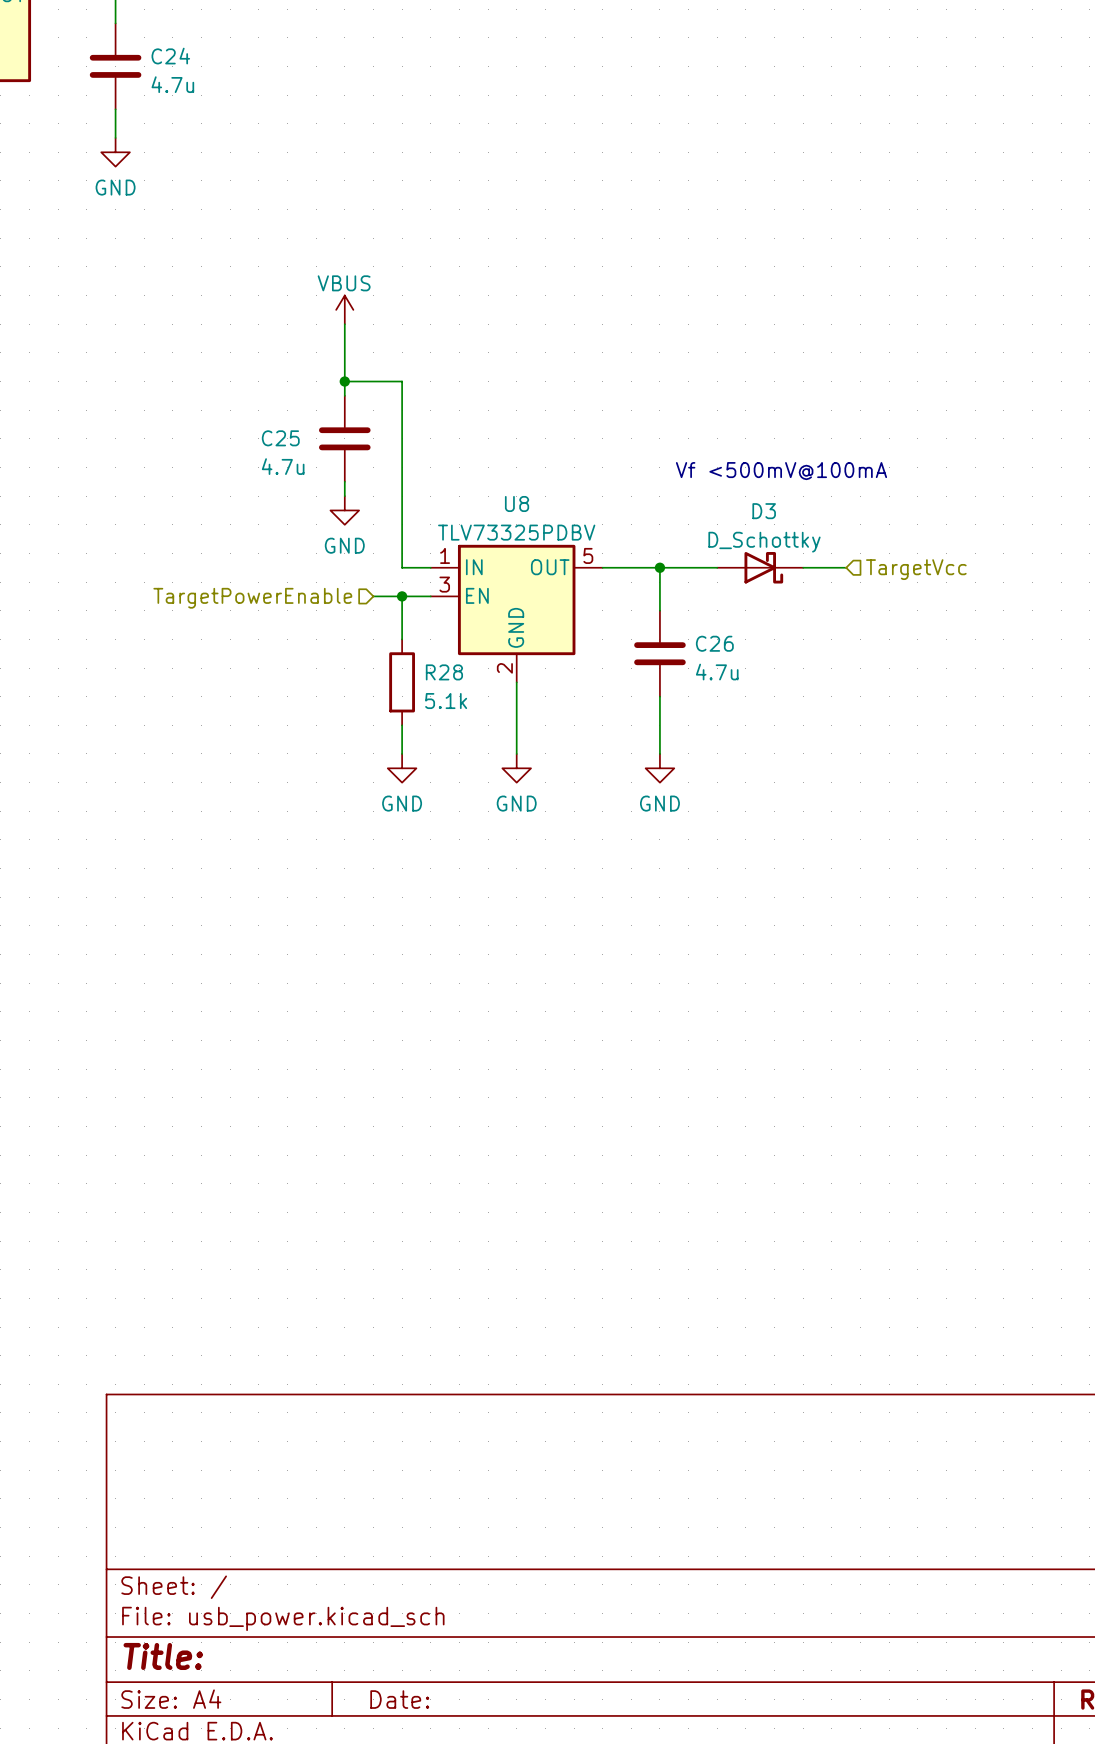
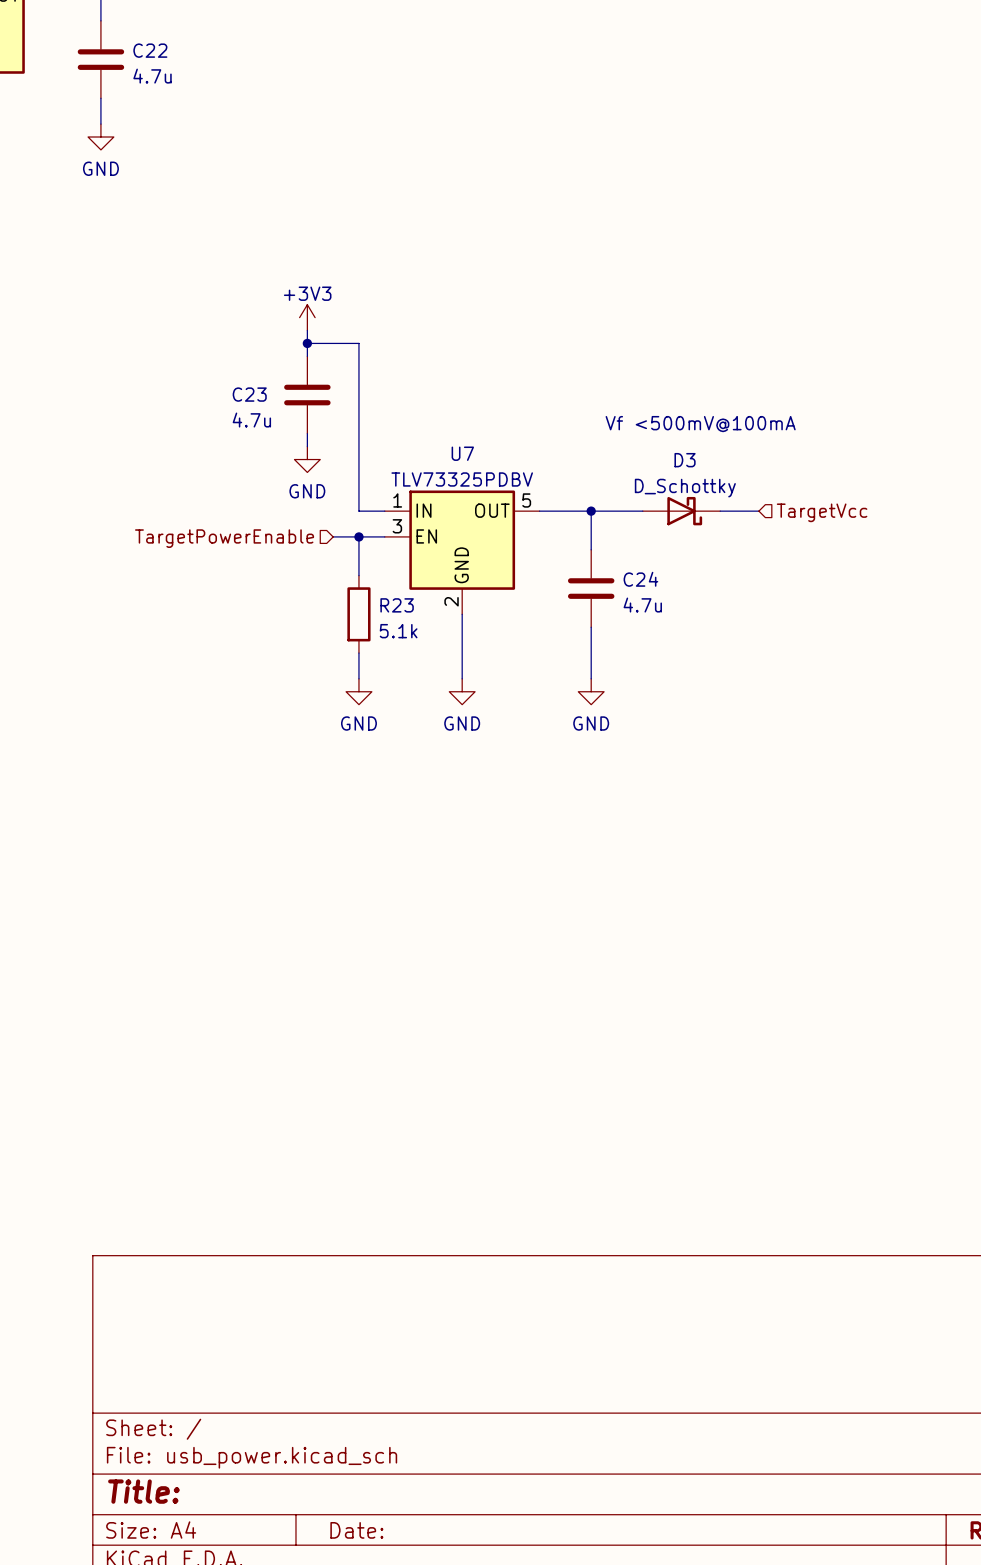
C24 name: C24 (170, 56) -> C22 (150, 50)
power symbol: VBUS (344, 309) -> none
power symbol: none -> +3V3 (307, 317)
C25 name: C25 (280, 438) -> C23 (249, 394)
U8 name: U8 (517, 503) -> U7 (462, 453)
C26 name: C26 (714, 643) -> C24 (640, 579)
R28 name: R28 (444, 672) -> R23 (397, 605)

